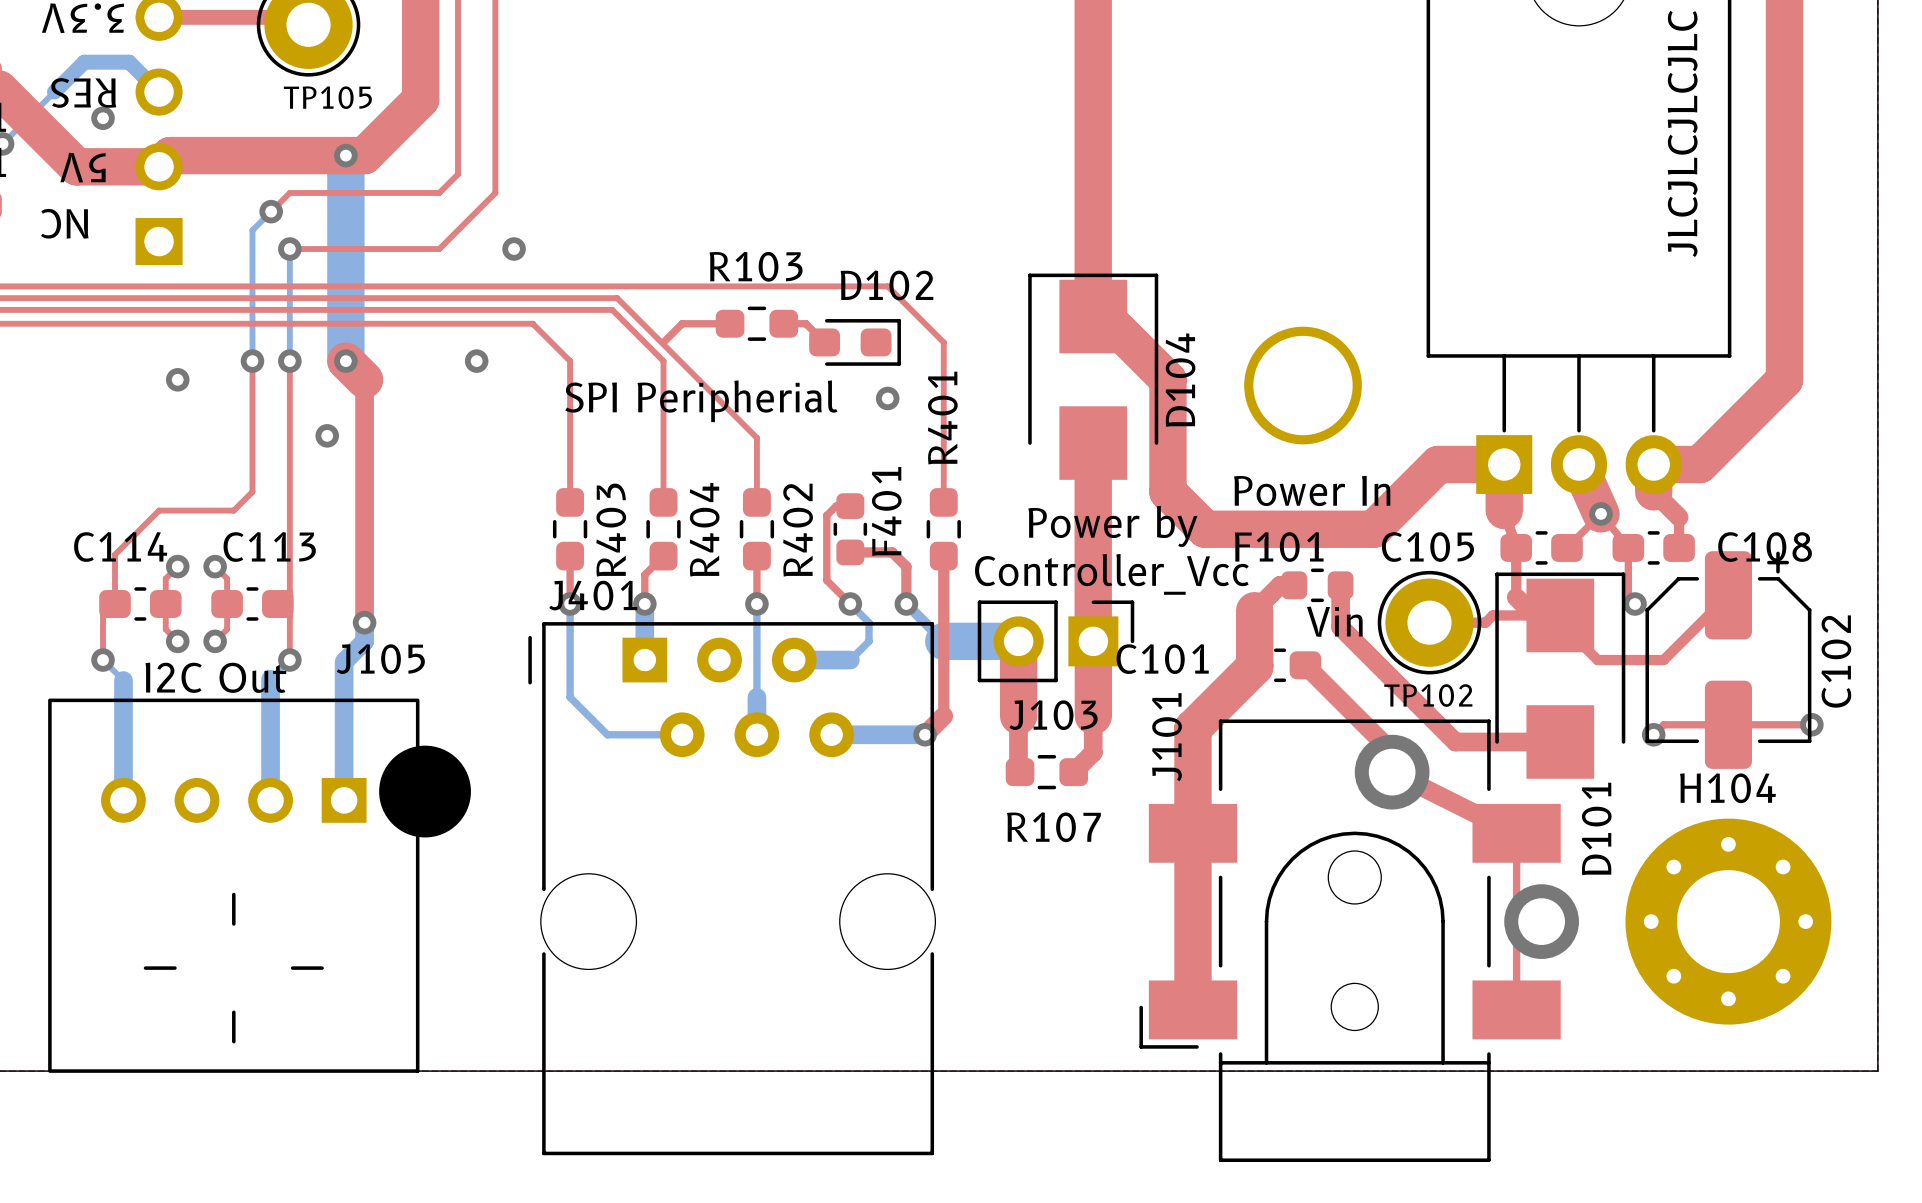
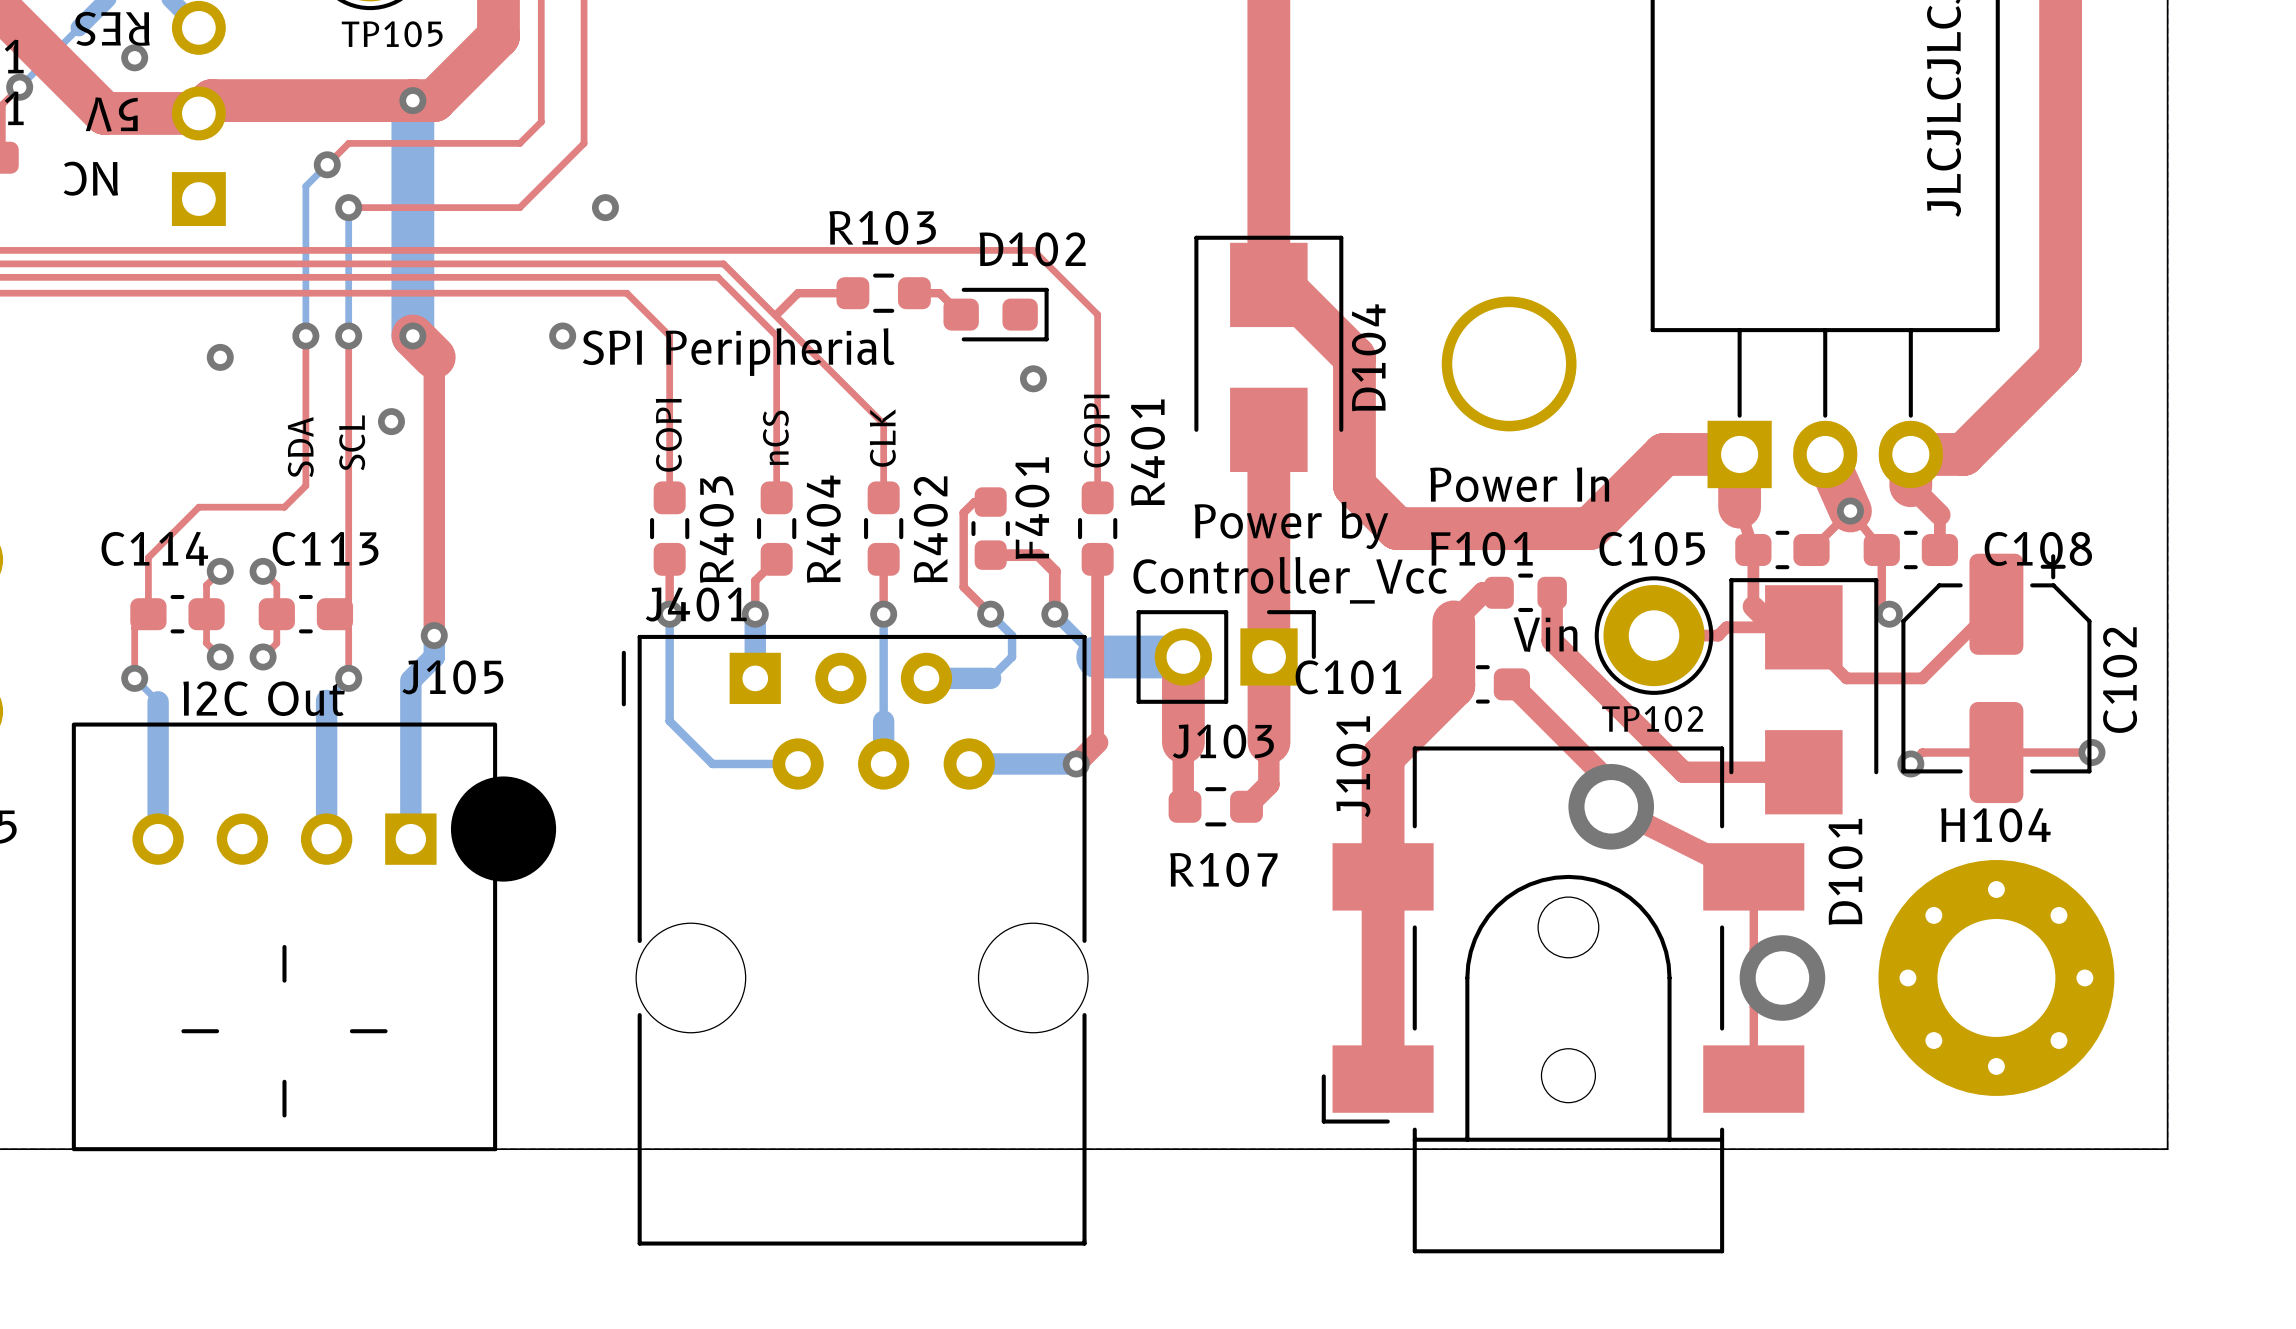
text position: SPI Peripherial (701, 401) -> SPI Peripherial (738, 352)
R401 name position: R401 (942, 418) -> R401 (1147, 452)
text: none -> COPI (1096, 431)
text: none -> COPI (668, 435)
text: none -> nCS (775, 437)
text: none -> CLK (882, 438)
text: none -> SCL (352, 442)
text: none -> SDA (300, 447)

